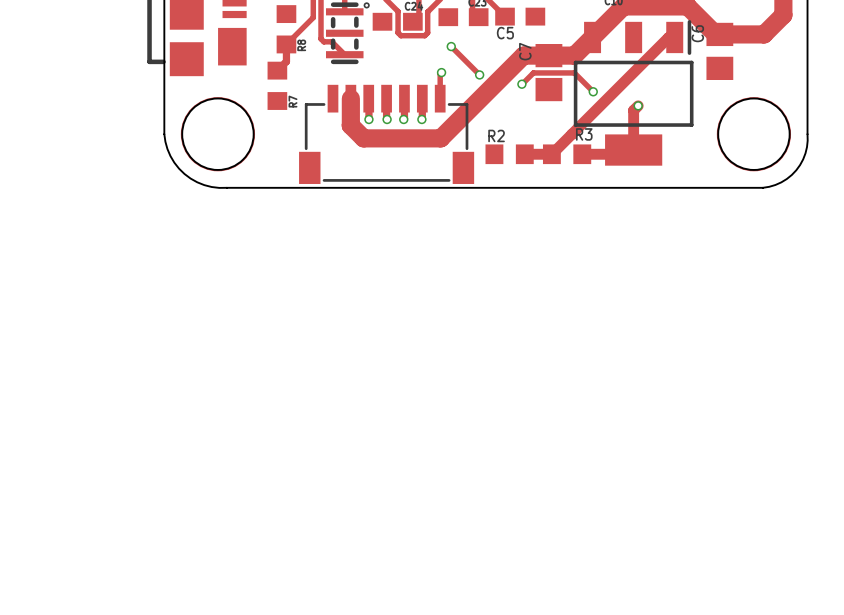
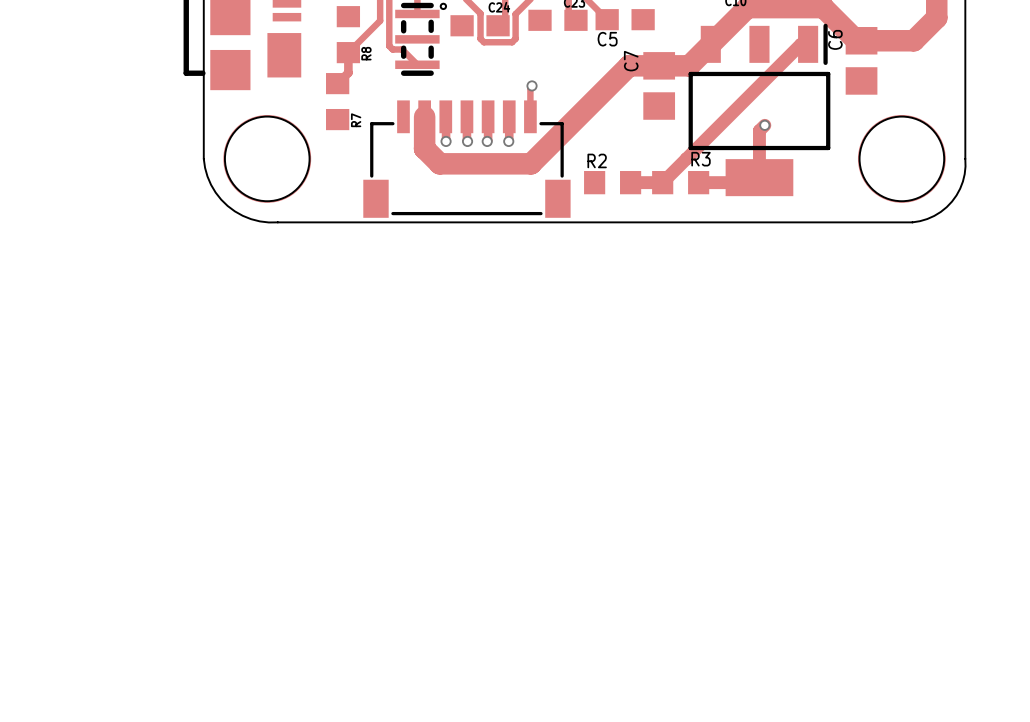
track: (451, 46) (479, 74) -> none
via: (451, 46) -> none
via: (479, 74) -> none
via: (521, 84) -> none
track: (522, 84) (533, 72) (574, 72) (593, 91) -> none
via: (593, 91) -> none

